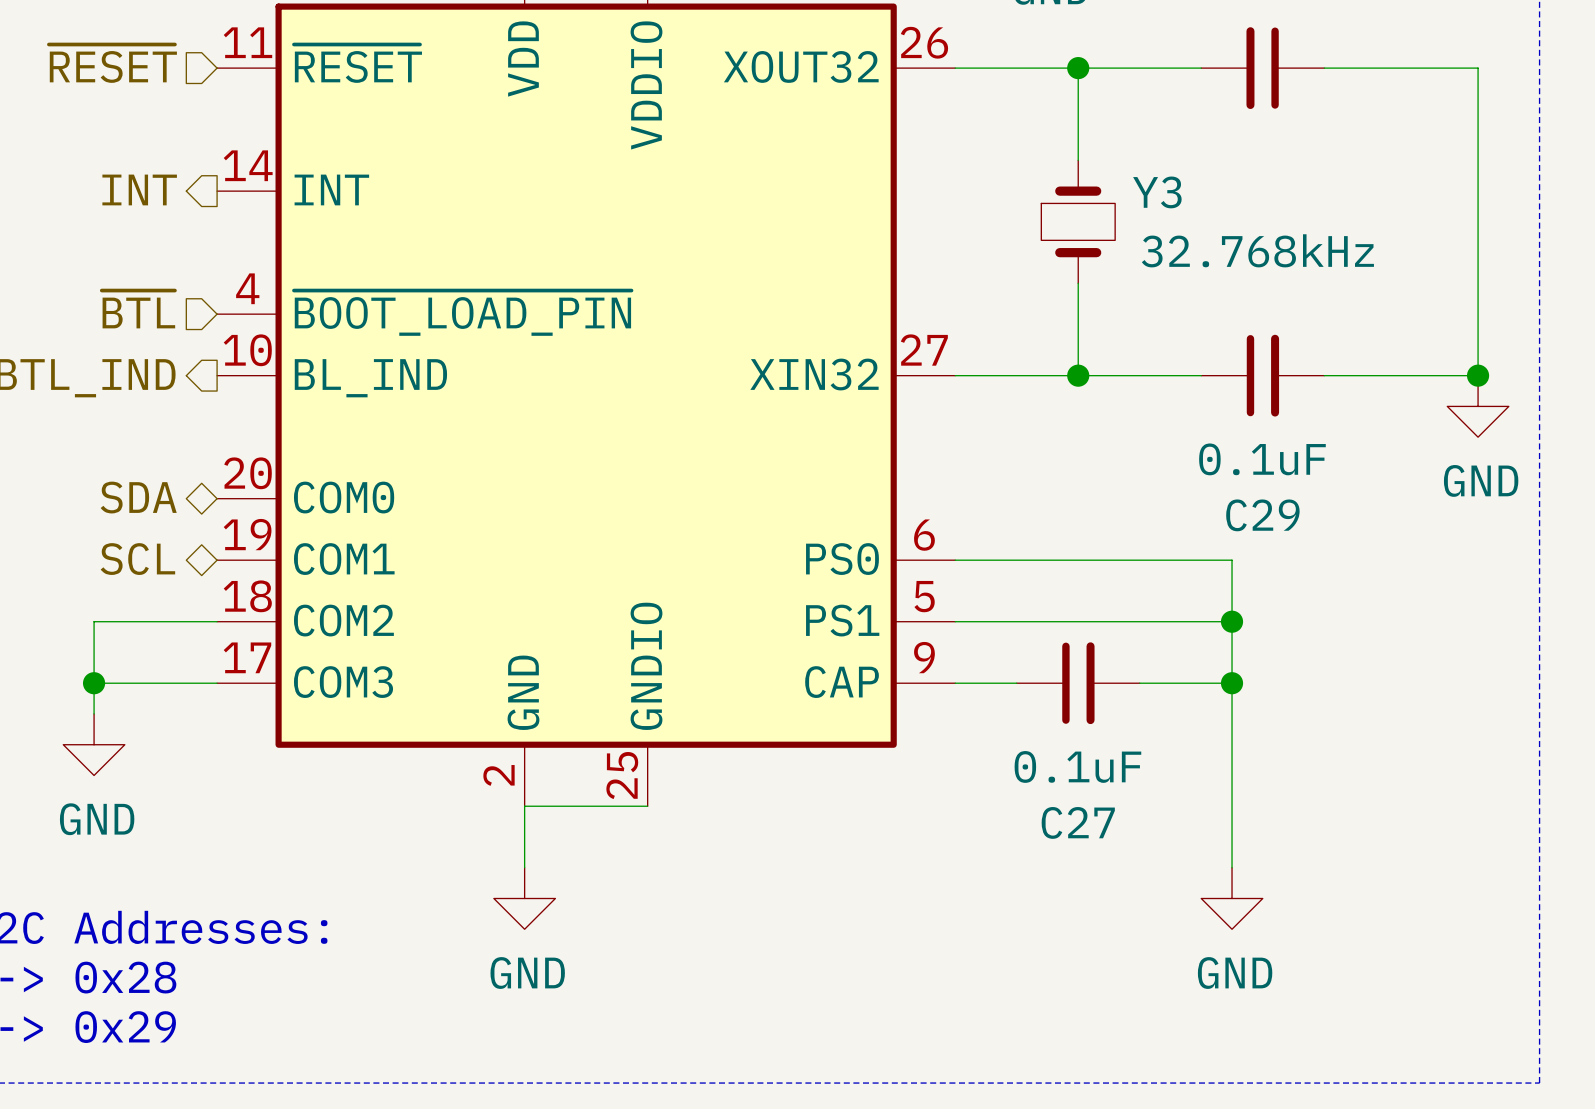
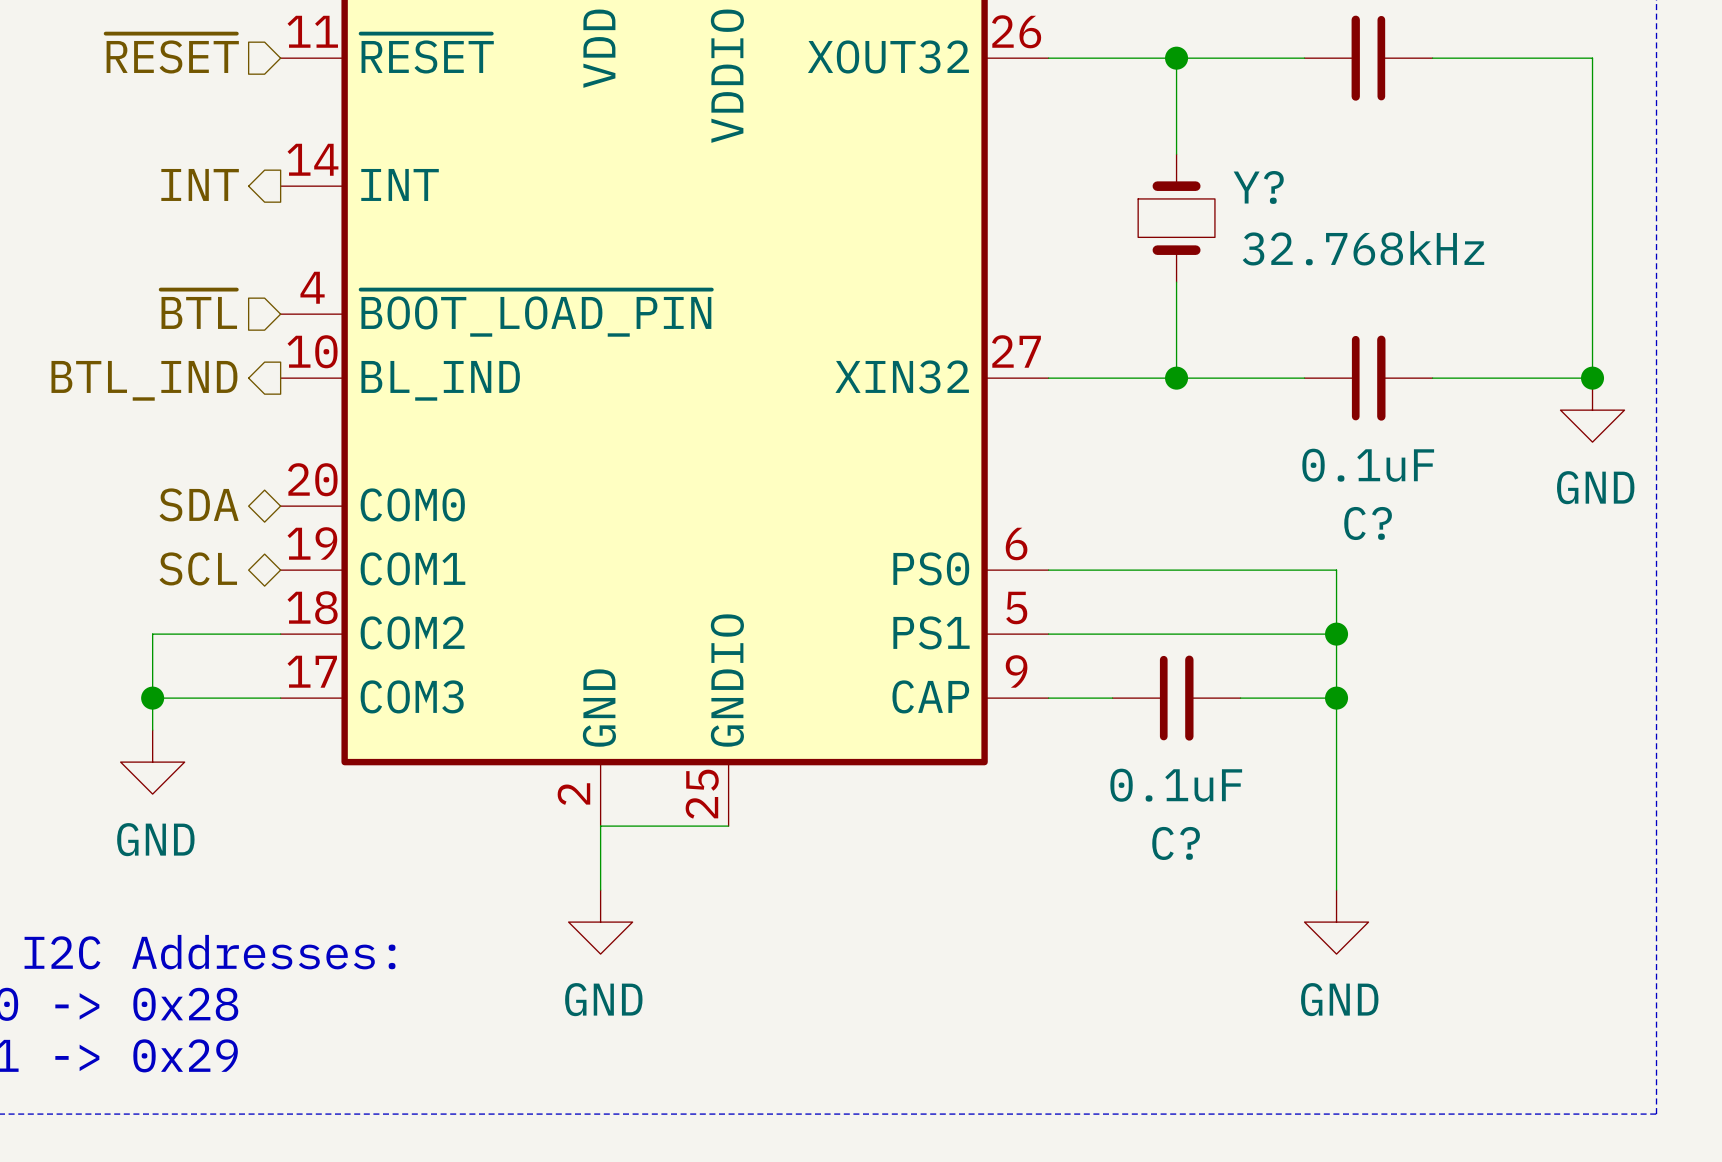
Y3 name: Y3 (1157, 192) -> Y? (1258, 187)
C29 name: C29 (1262, 515) -> C? (1368, 523)
C27 name: C27 (1078, 822) -> C? (1176, 843)

